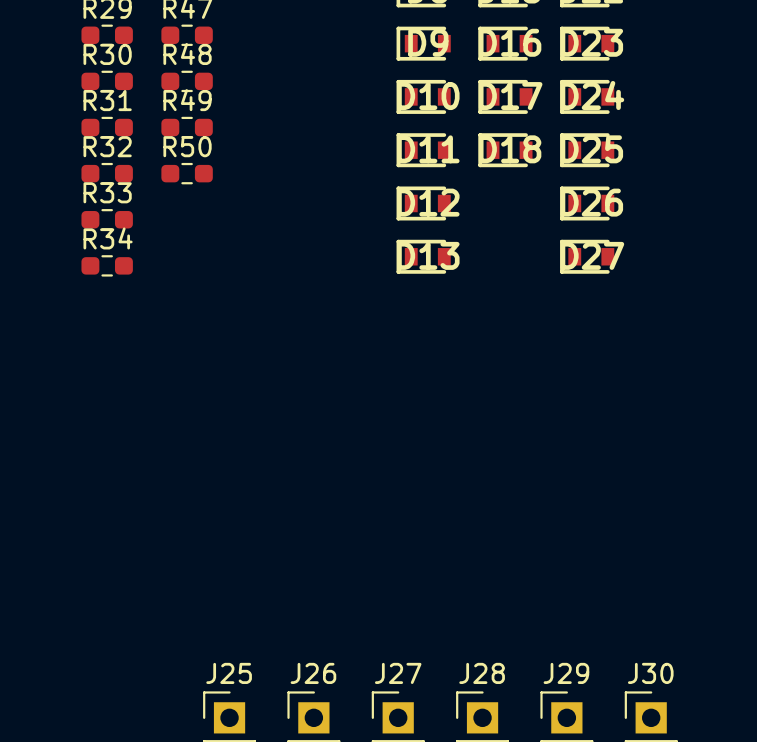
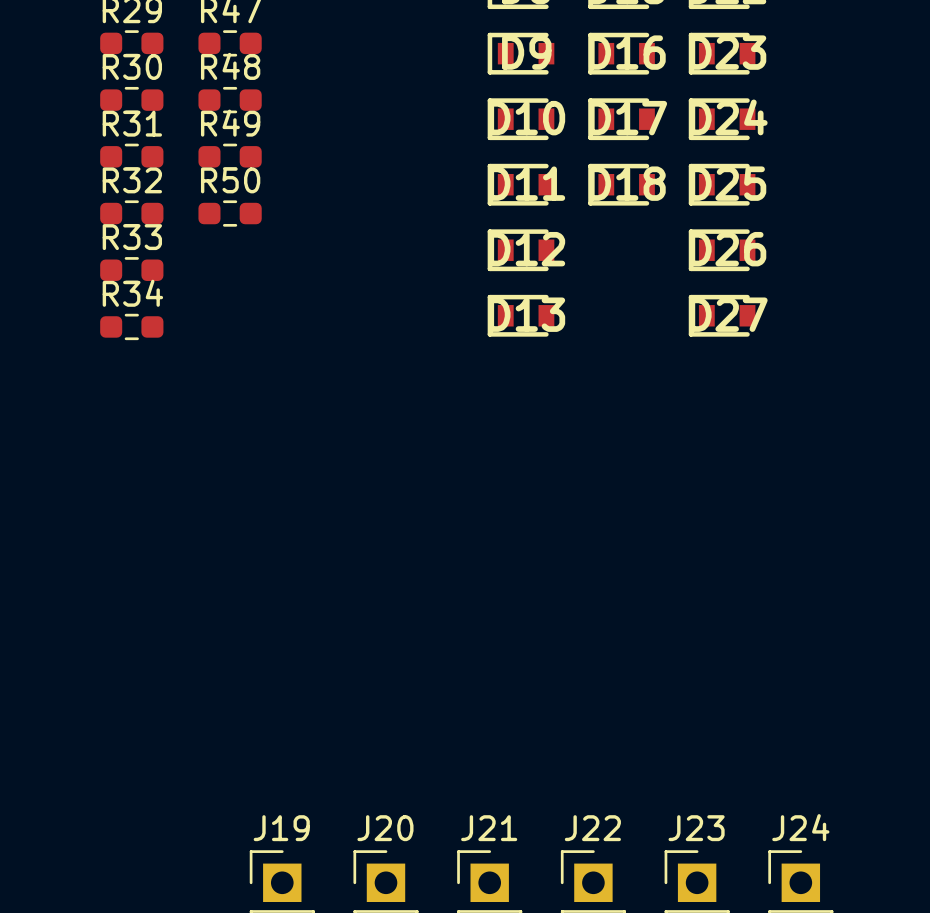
J25 name: J25 (229, 673) -> J19 (281, 828)
J26 name: J26 (313, 673) -> J20 (385, 828)
J27 name: J27 (398, 673) -> J21 (489, 828)
J28 name: J28 (482, 673) -> J22 (592, 828)
J29 name: J29 (566, 673) -> J23 (696, 828)
J30 name: J30 (650, 673) -> J24 (800, 827)

